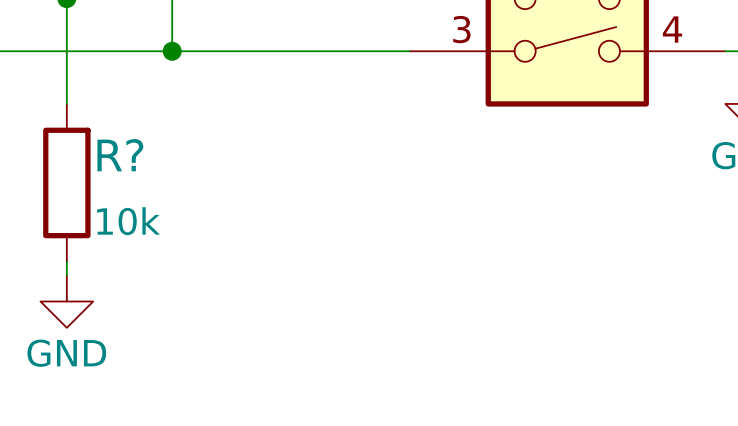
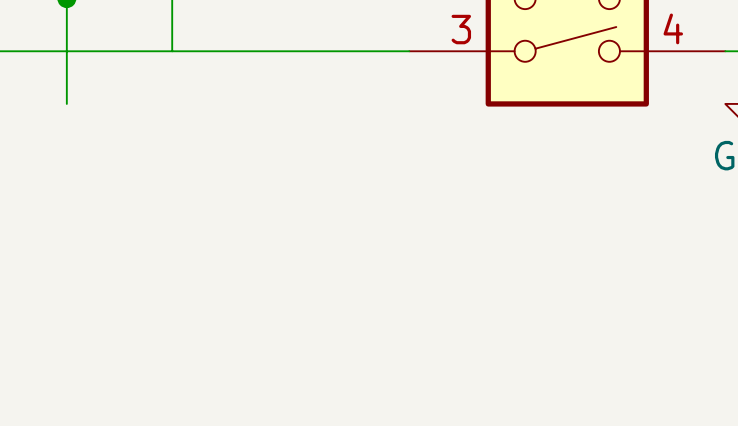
junction: (172, 51) -> none
R?: (66, 182) -> none
wire: (66, 261) (66, 275) -> none
power symbol: GND (66, 301) -> none

